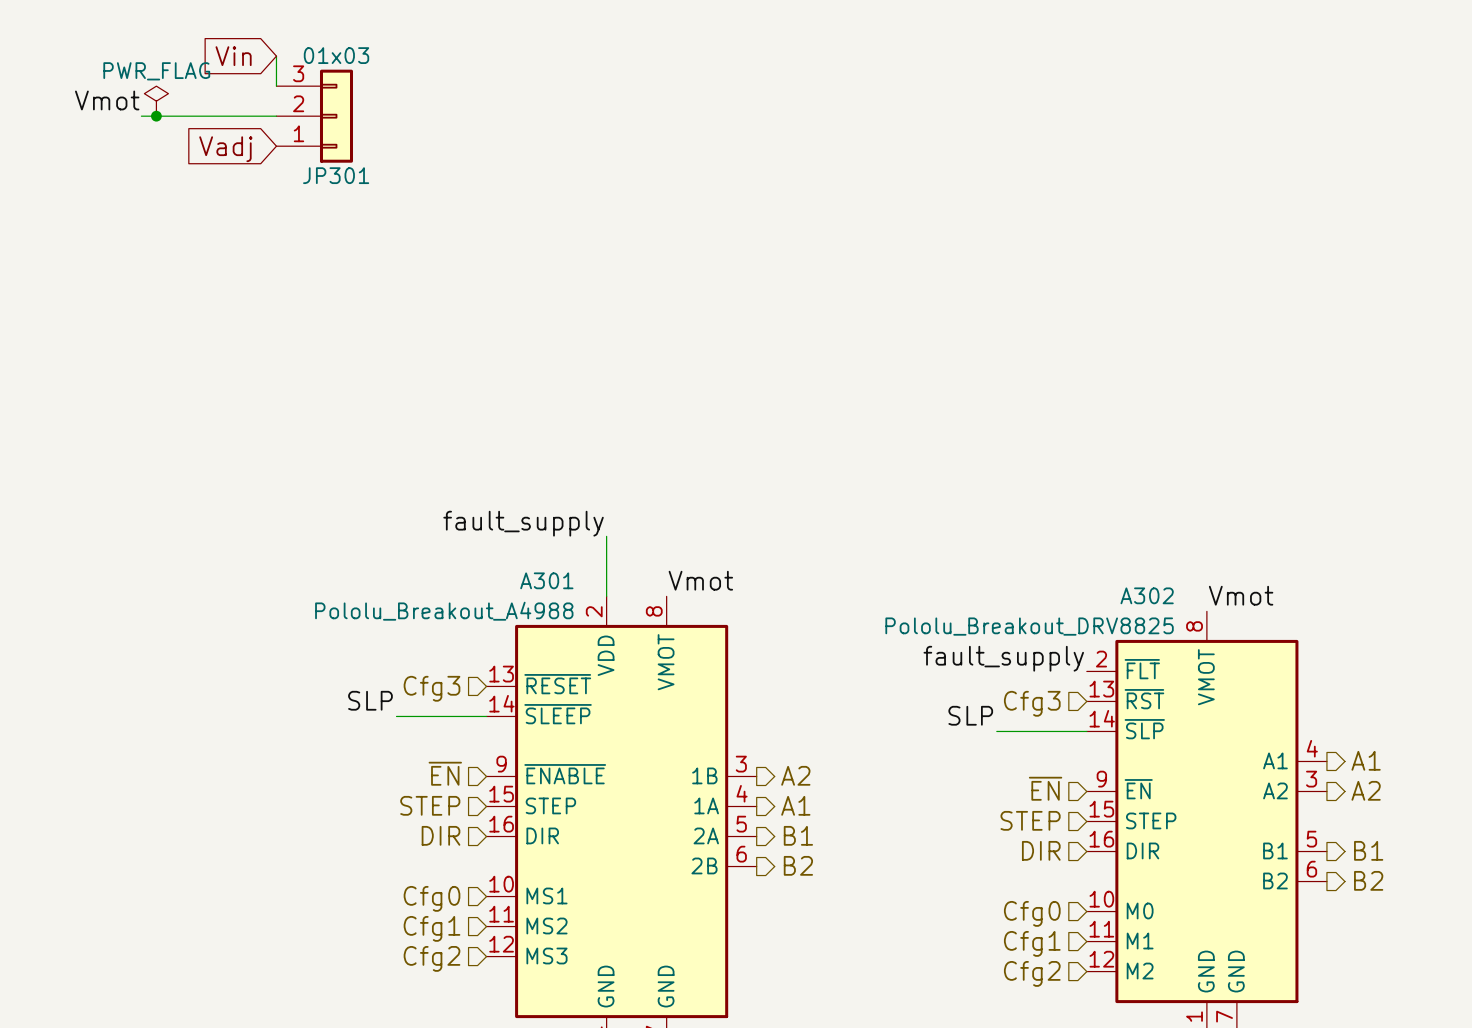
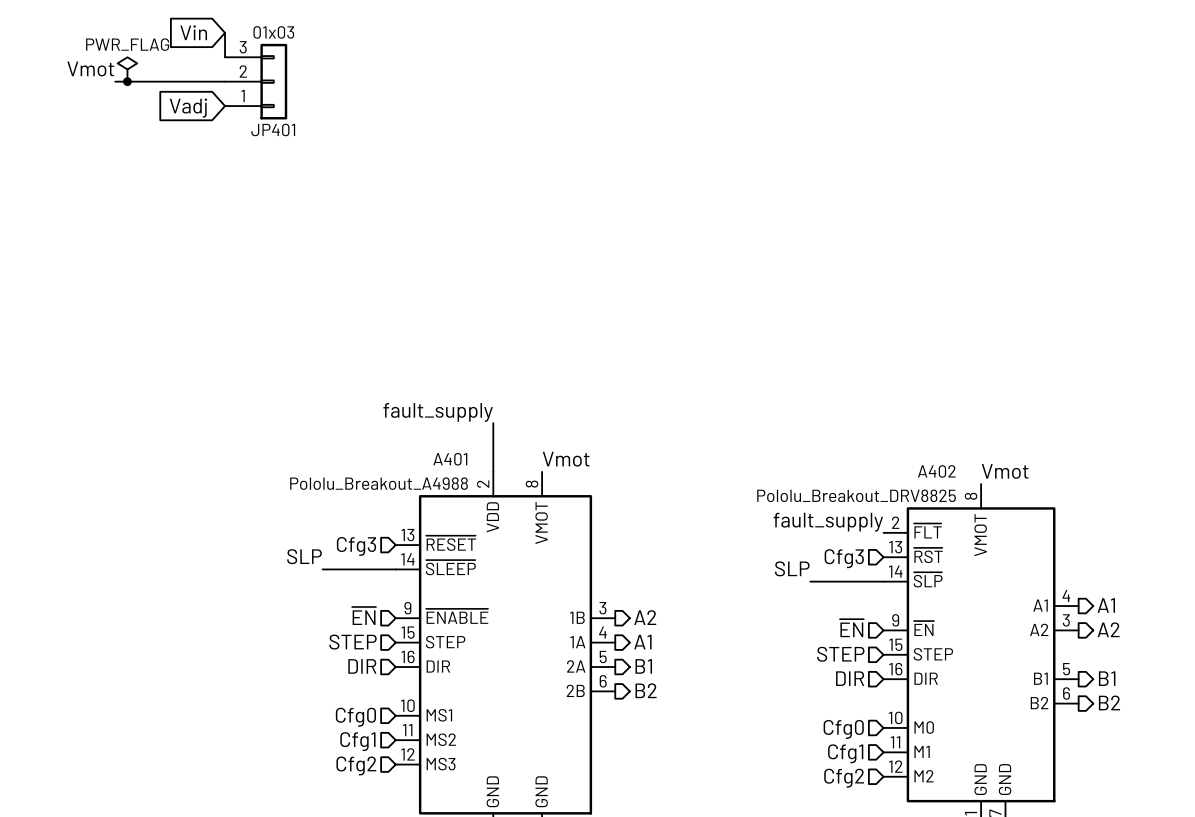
JP301 name: JP301 (336, 175) -> JP401 (273, 129)
A301 name: A301 (546, 580) -> A401 (450, 459)
A302 name: A302 (1147, 595) -> A402 (936, 471)

